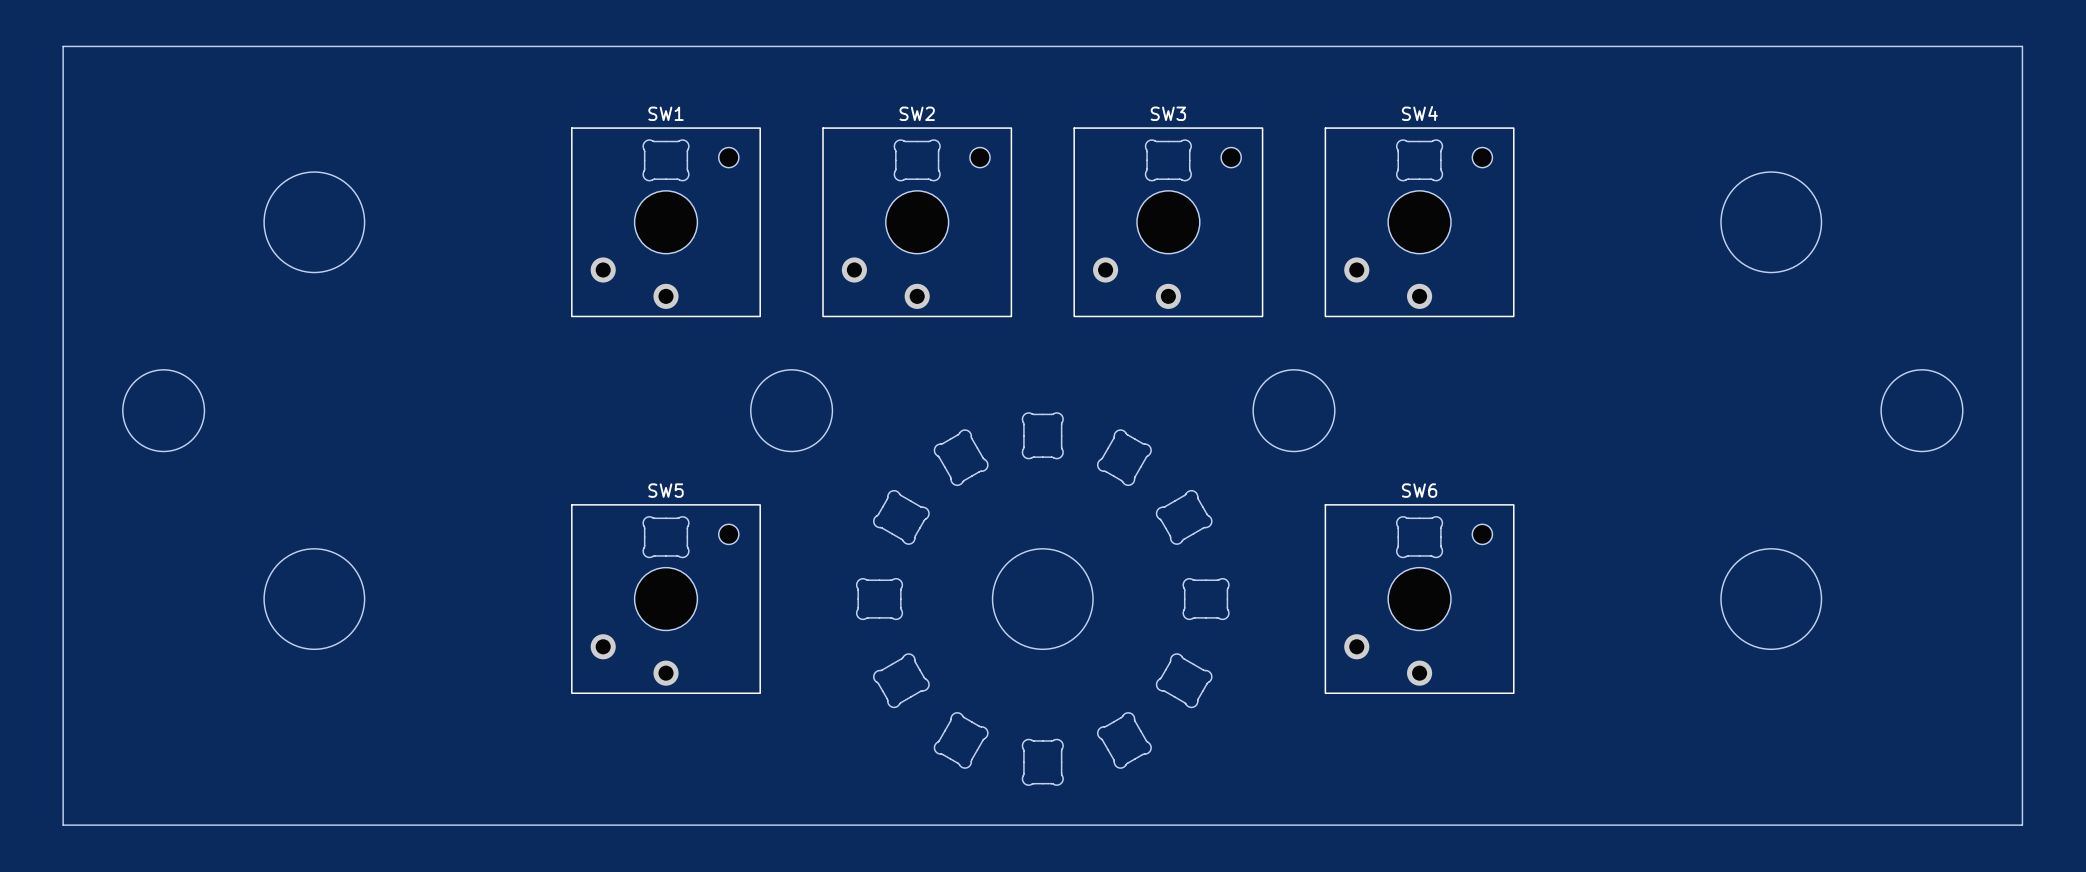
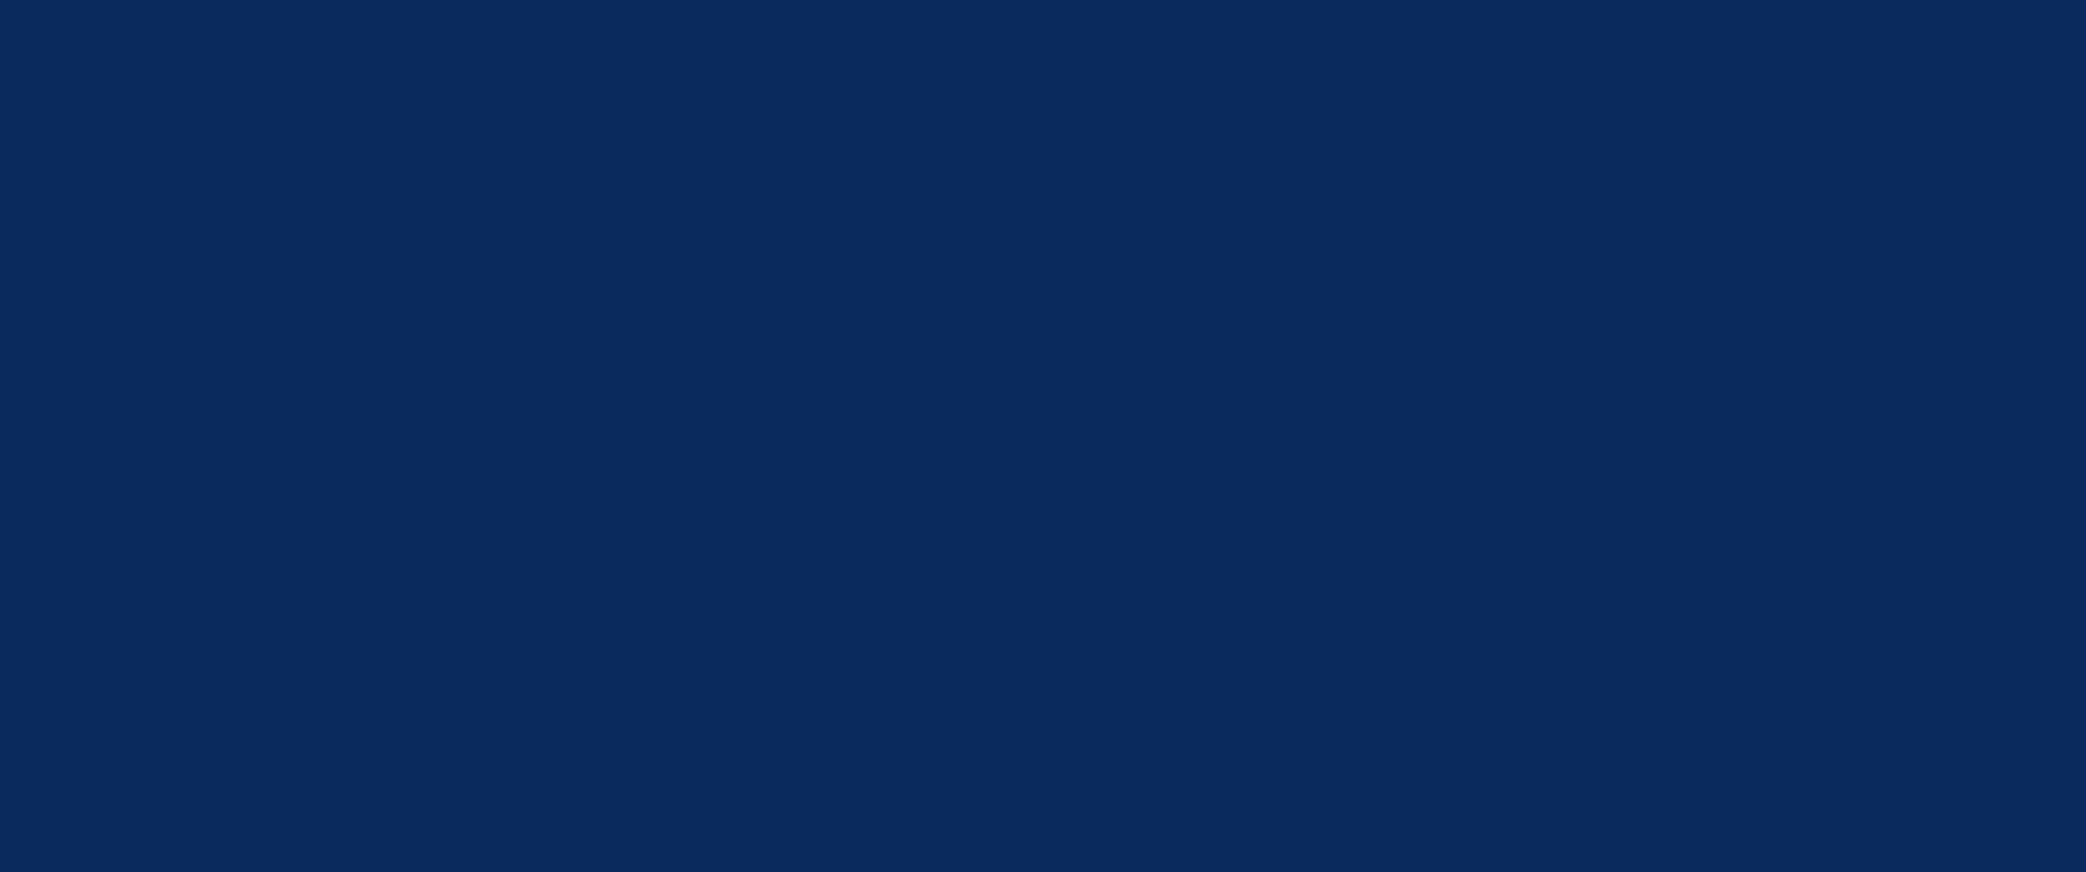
board edge: (63, 46) (2022, 46) (2022, 825) (63, 825) (63, 46) -> none
part: (666, 160) -> none
part: (917, 160) -> none
part: (1168, 160) -> none
part: (1419, 160) -> none
round board edge: [263, 171, 366, 274] -> none
round board edge: [1720, 171, 1823, 274] -> none
SW1: (666, 222) -> none
SW2: (917, 222) -> none
SW3: (1168, 222) -> none
SW4: (1419, 222) -> none
round board edge: [122, 369, 206, 453] -> none
round board edge: [750, 369, 834, 453] -> none
round board edge: [1252, 369, 1336, 453] -> none
round board edge: [1880, 369, 1964, 453] -> none
part: (1042, 435) -> none
part: (961, 457) -> none
part: (1124, 457) -> none
part: (901, 517) -> none
part: (1184, 517) -> none
part: (666, 537) -> none
part: (1419, 537) -> none
round board edge: [263, 548, 366, 650] -> none
round board edge: [991, 548, 1094, 650] -> none
round board edge: [1720, 548, 1823, 650] -> none
SW5: (666, 599) -> none
part: (879, 599) -> none
part: (1206, 599) -> none
SW6: (1419, 599) -> none
part: (901, 680) -> none
part: (1184, 680) -> none
part: (961, 740) -> none
part: (1124, 740) -> none
part: (1042, 762) -> none

